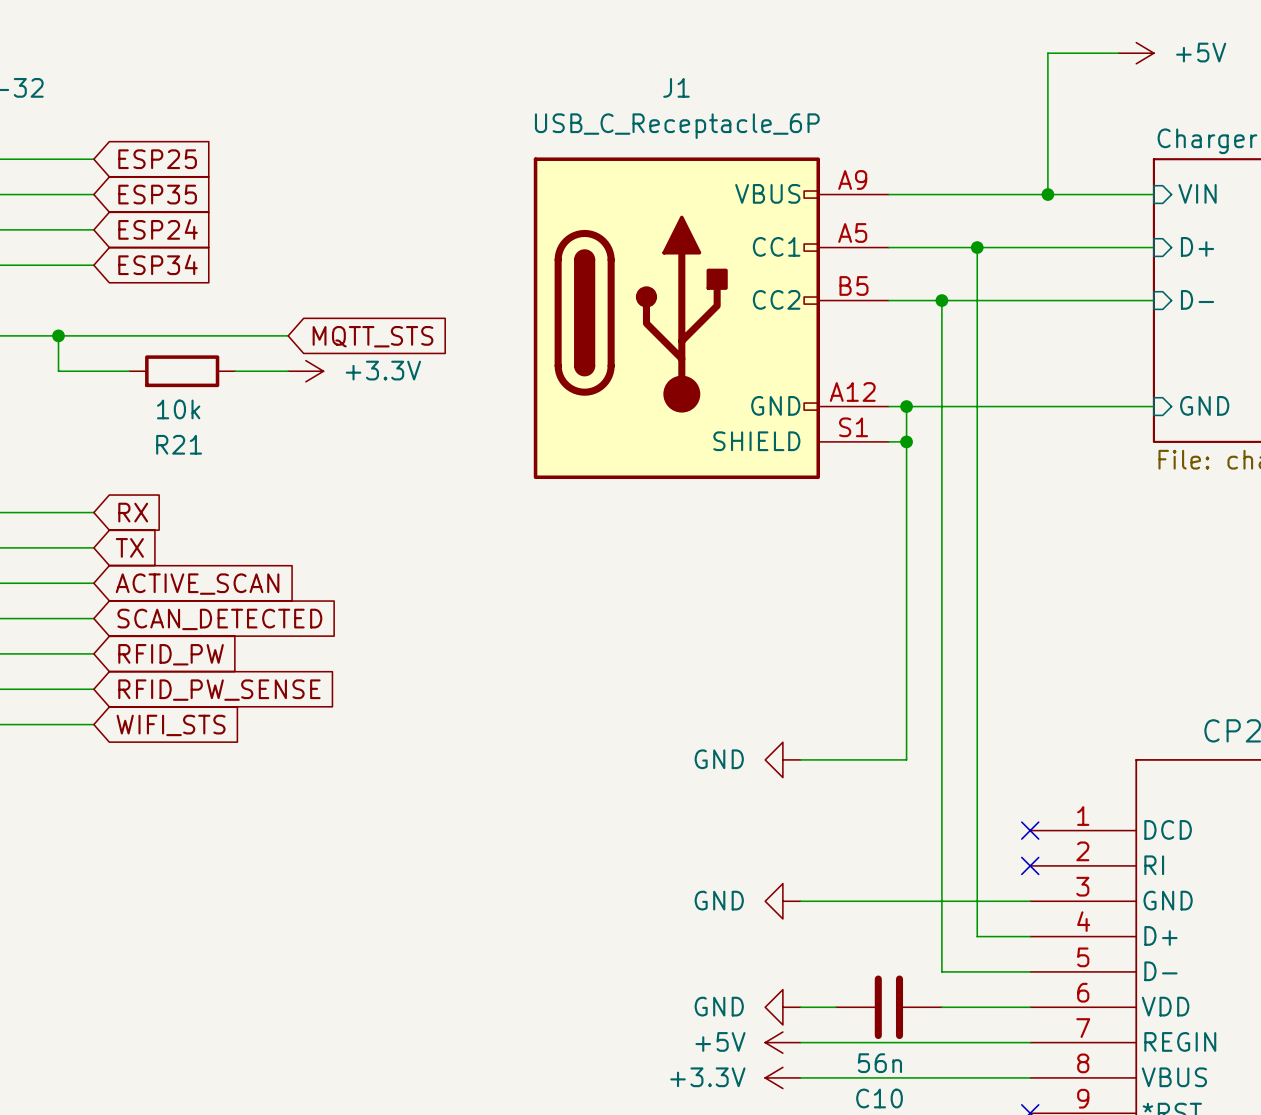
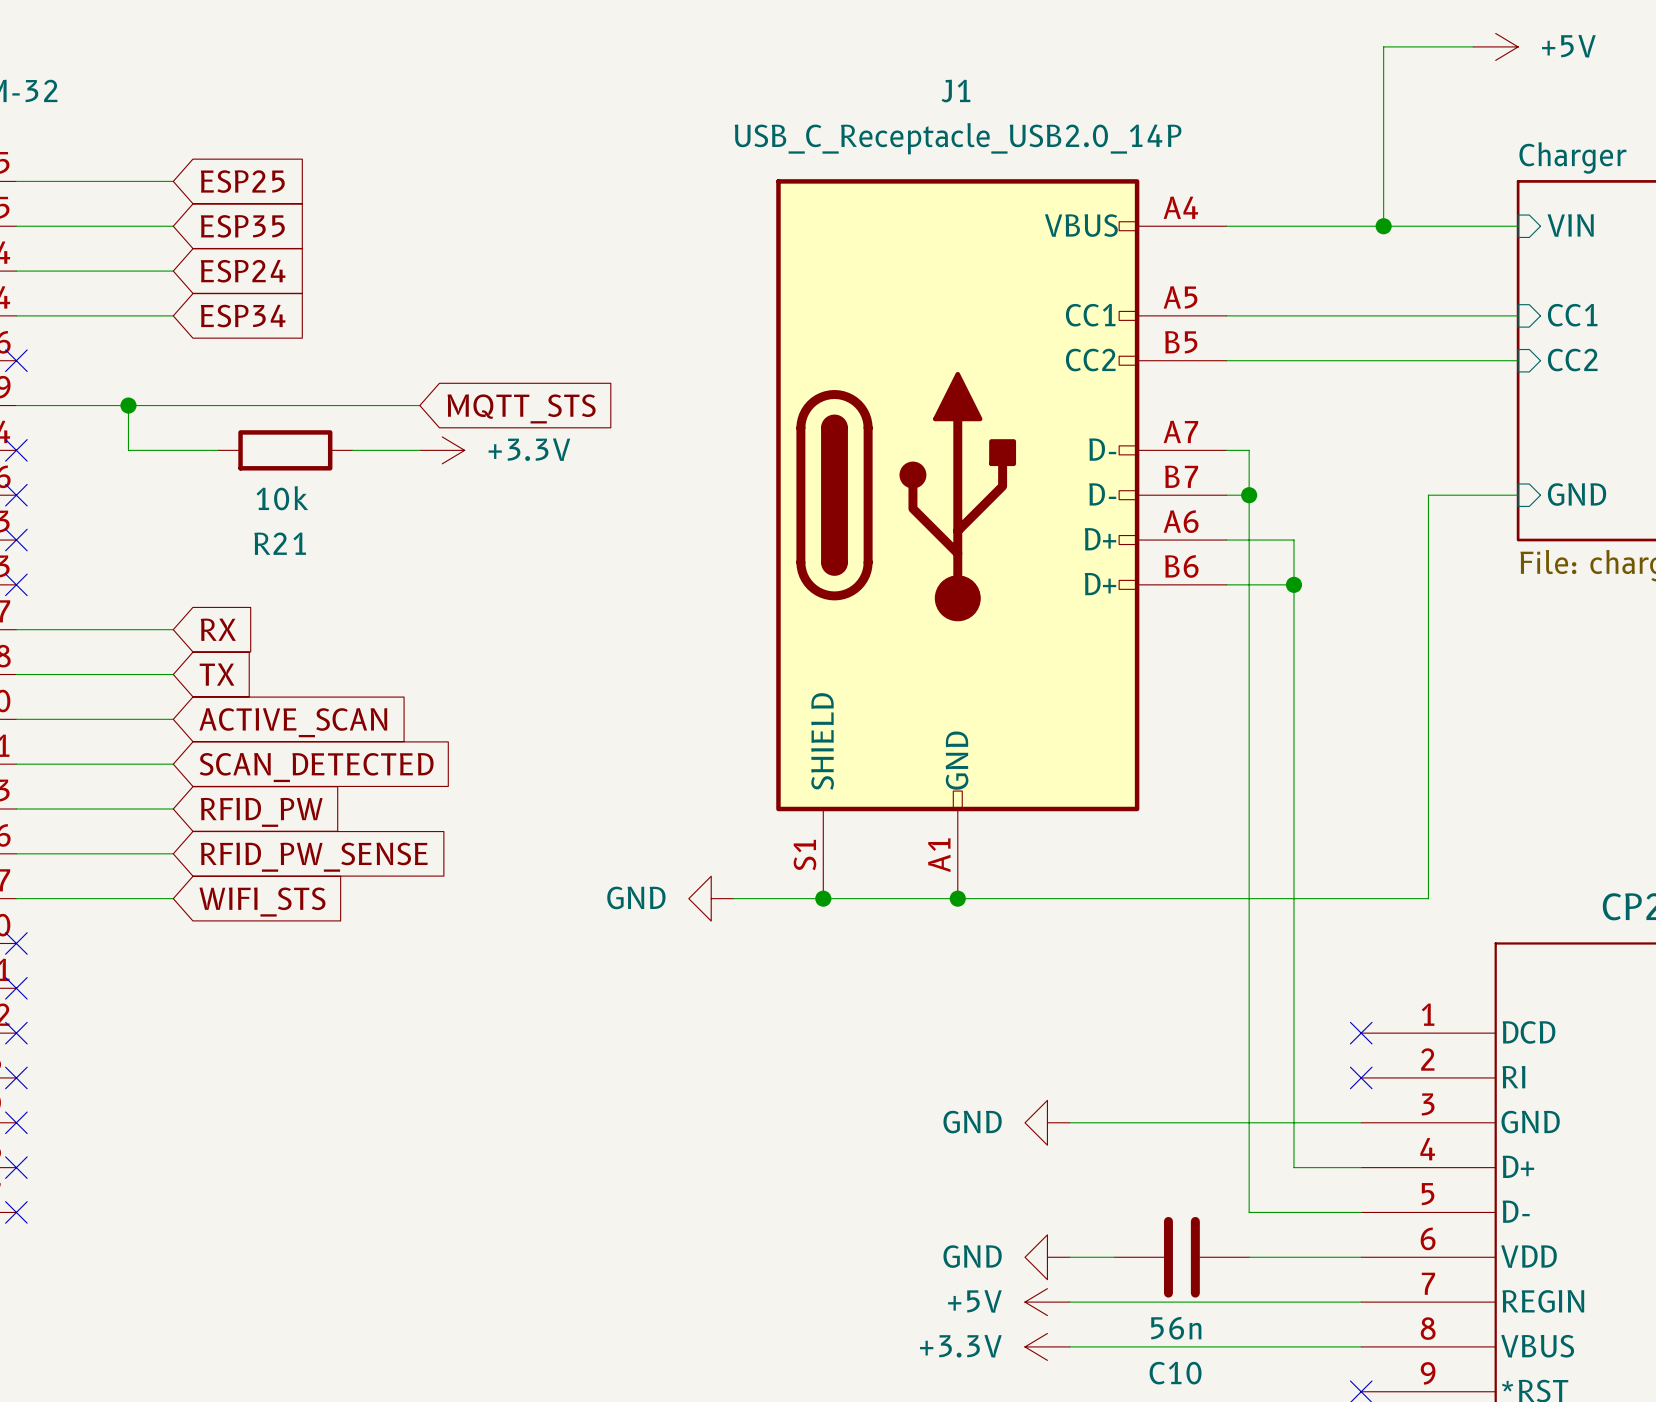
J1 name position: J1 (676, 87) -> J1 (955, 91)
J1 value: USB_C_Receptacle_6P (677, 126) -> USB_C_Receptacle_USB2.0_14P (958, 138)
J1 symbol: [533, 157, 889, 480] -> [776, 179, 1227, 899]
sheet pin: D+ (1197, 246) -> none
wire: (888, 247) (1153, 247) -> none
wire: (977, 247) (977, 441) -> (1226, 540) (1293, 540)
junction: (977, 247) -> none
sheet pin: none -> CC1 (1572, 315)
wire: none -> (1226, 315) (1518, 315)
sheet pin: D- (1197, 299) -> CC2 (1572, 360)
wire: (941, 300) (941, 371) -> (1226, 450) (1249, 450)
junction: (941, 300) -> none
wire: (906, 406) (906, 759) (800, 759) -> none
junction: (906, 406) -> none
wire: (941, 406) (1083, 406) -> (733, 898) (1428, 898) (1428, 495)
junction: none -> (1249, 495)
junction: (906, 441) -> none
wire: none -> (1226, 584) (1293, 584)
junction: none -> (1293, 584)
junction: none -> (823, 898)
junction: none -> (957, 898)
power symbol position: GND (782, 759) -> GND (711, 898)

